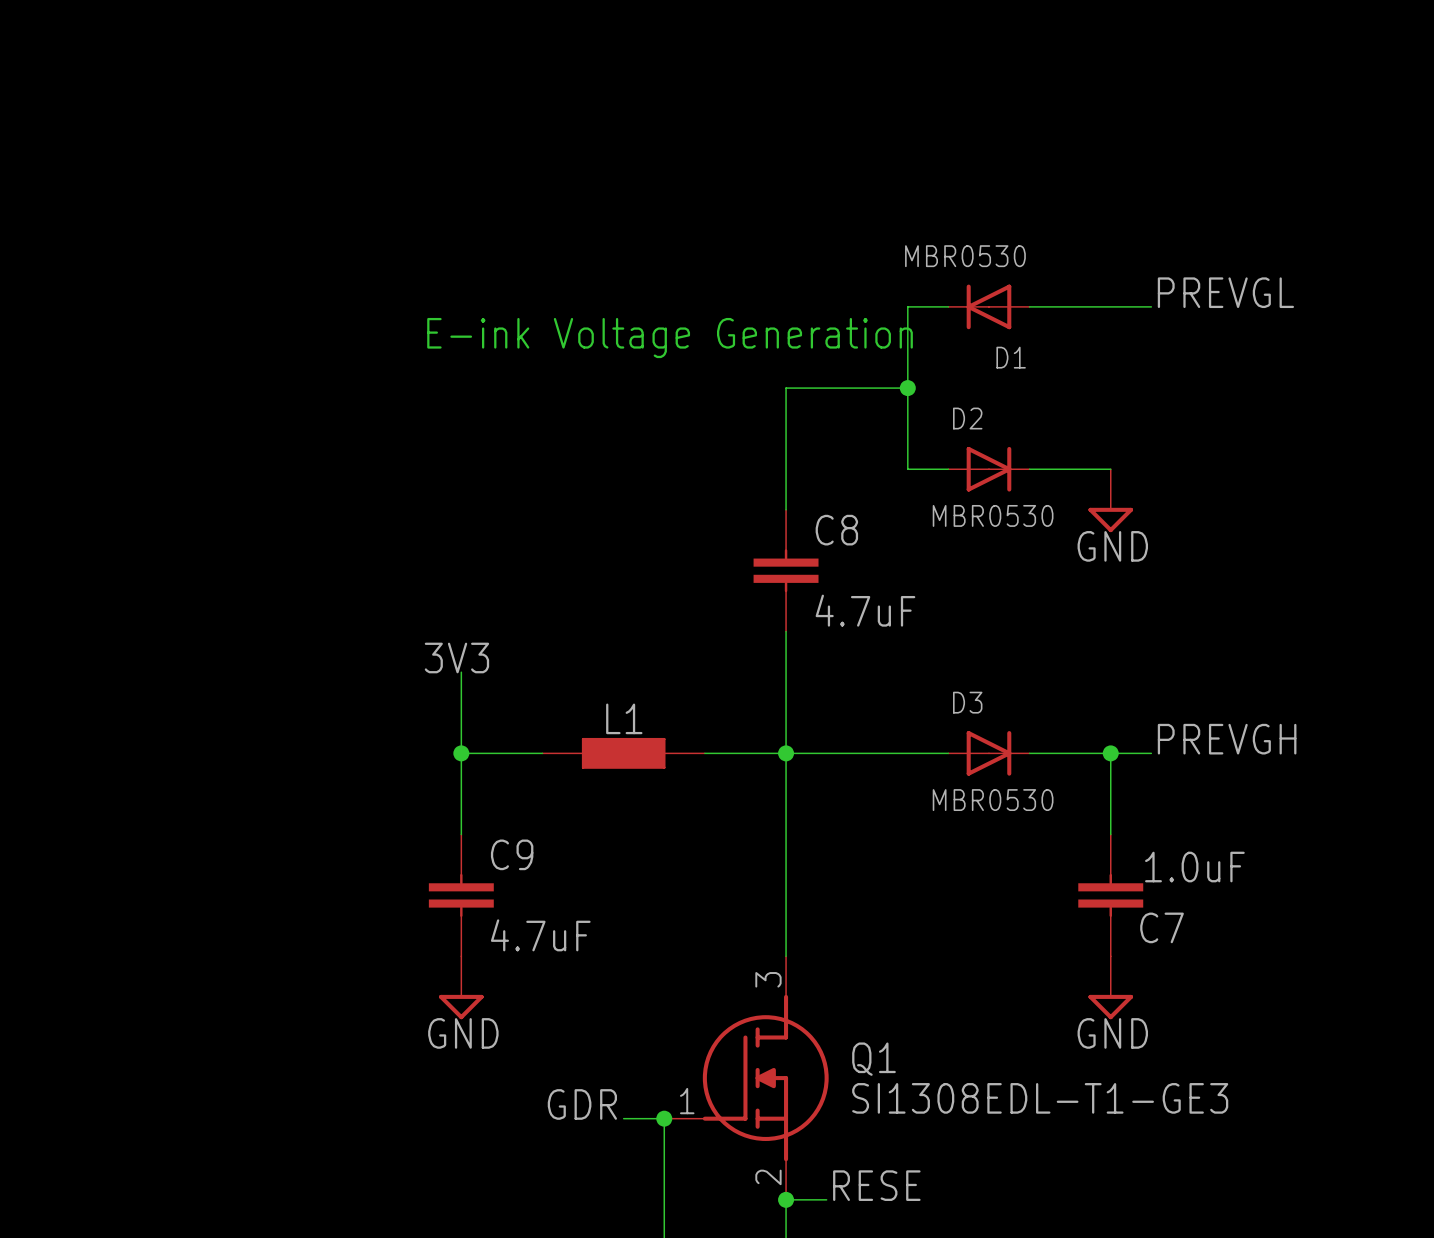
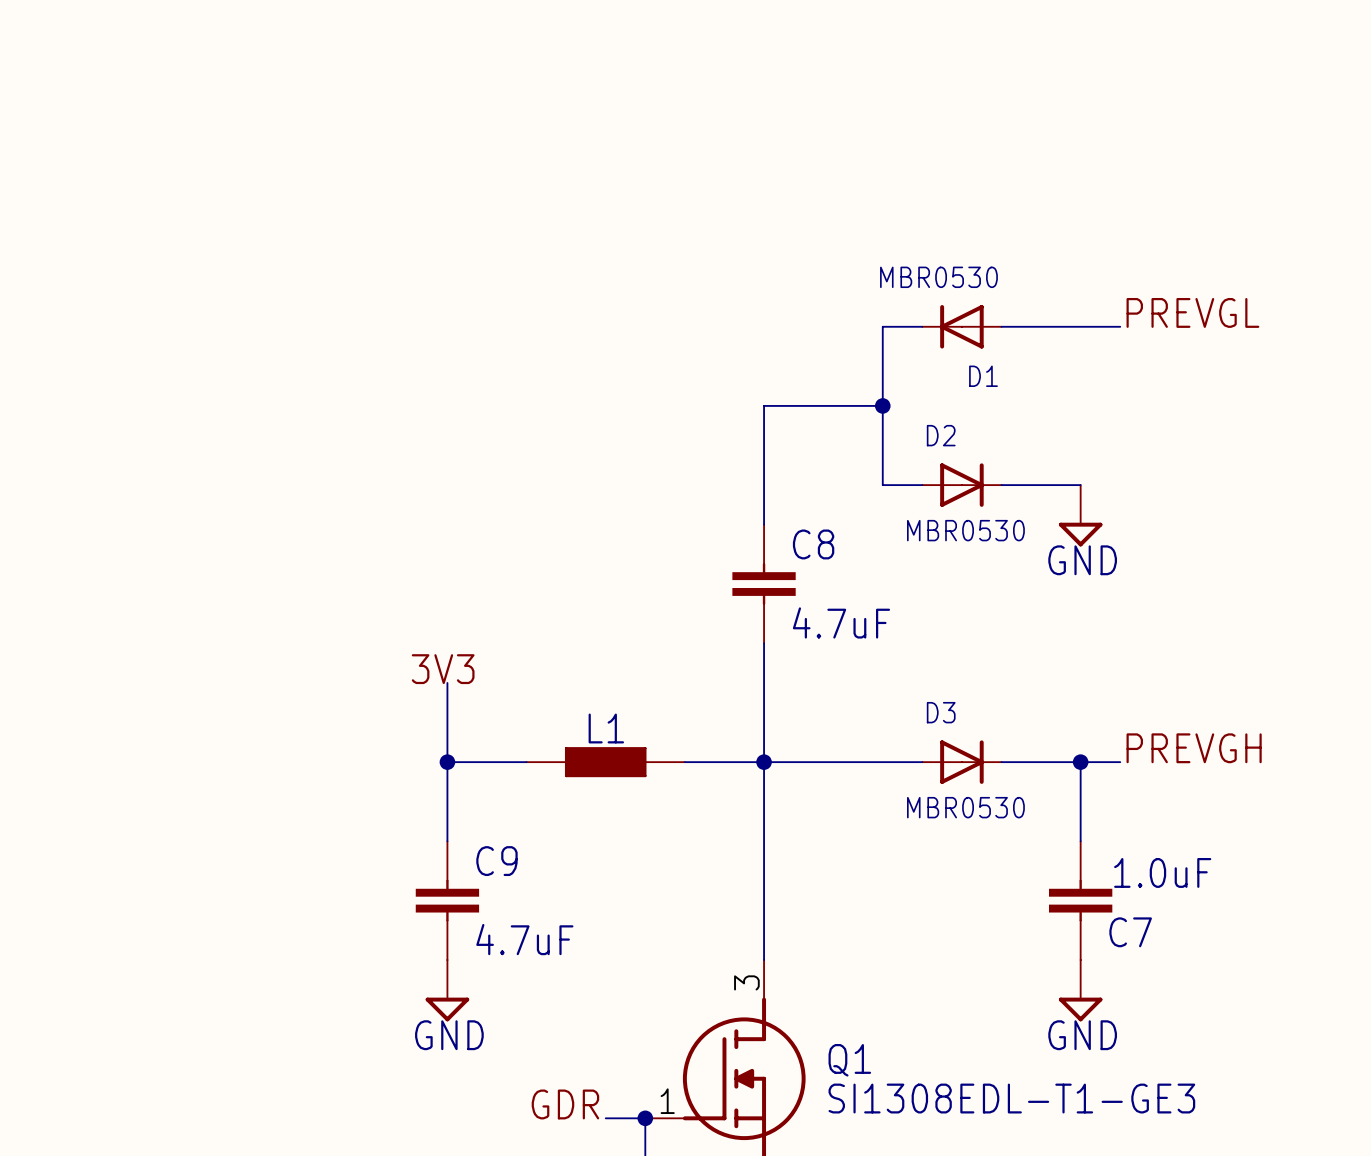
text: E-ink Voltage Generation (670, 338) -> none

